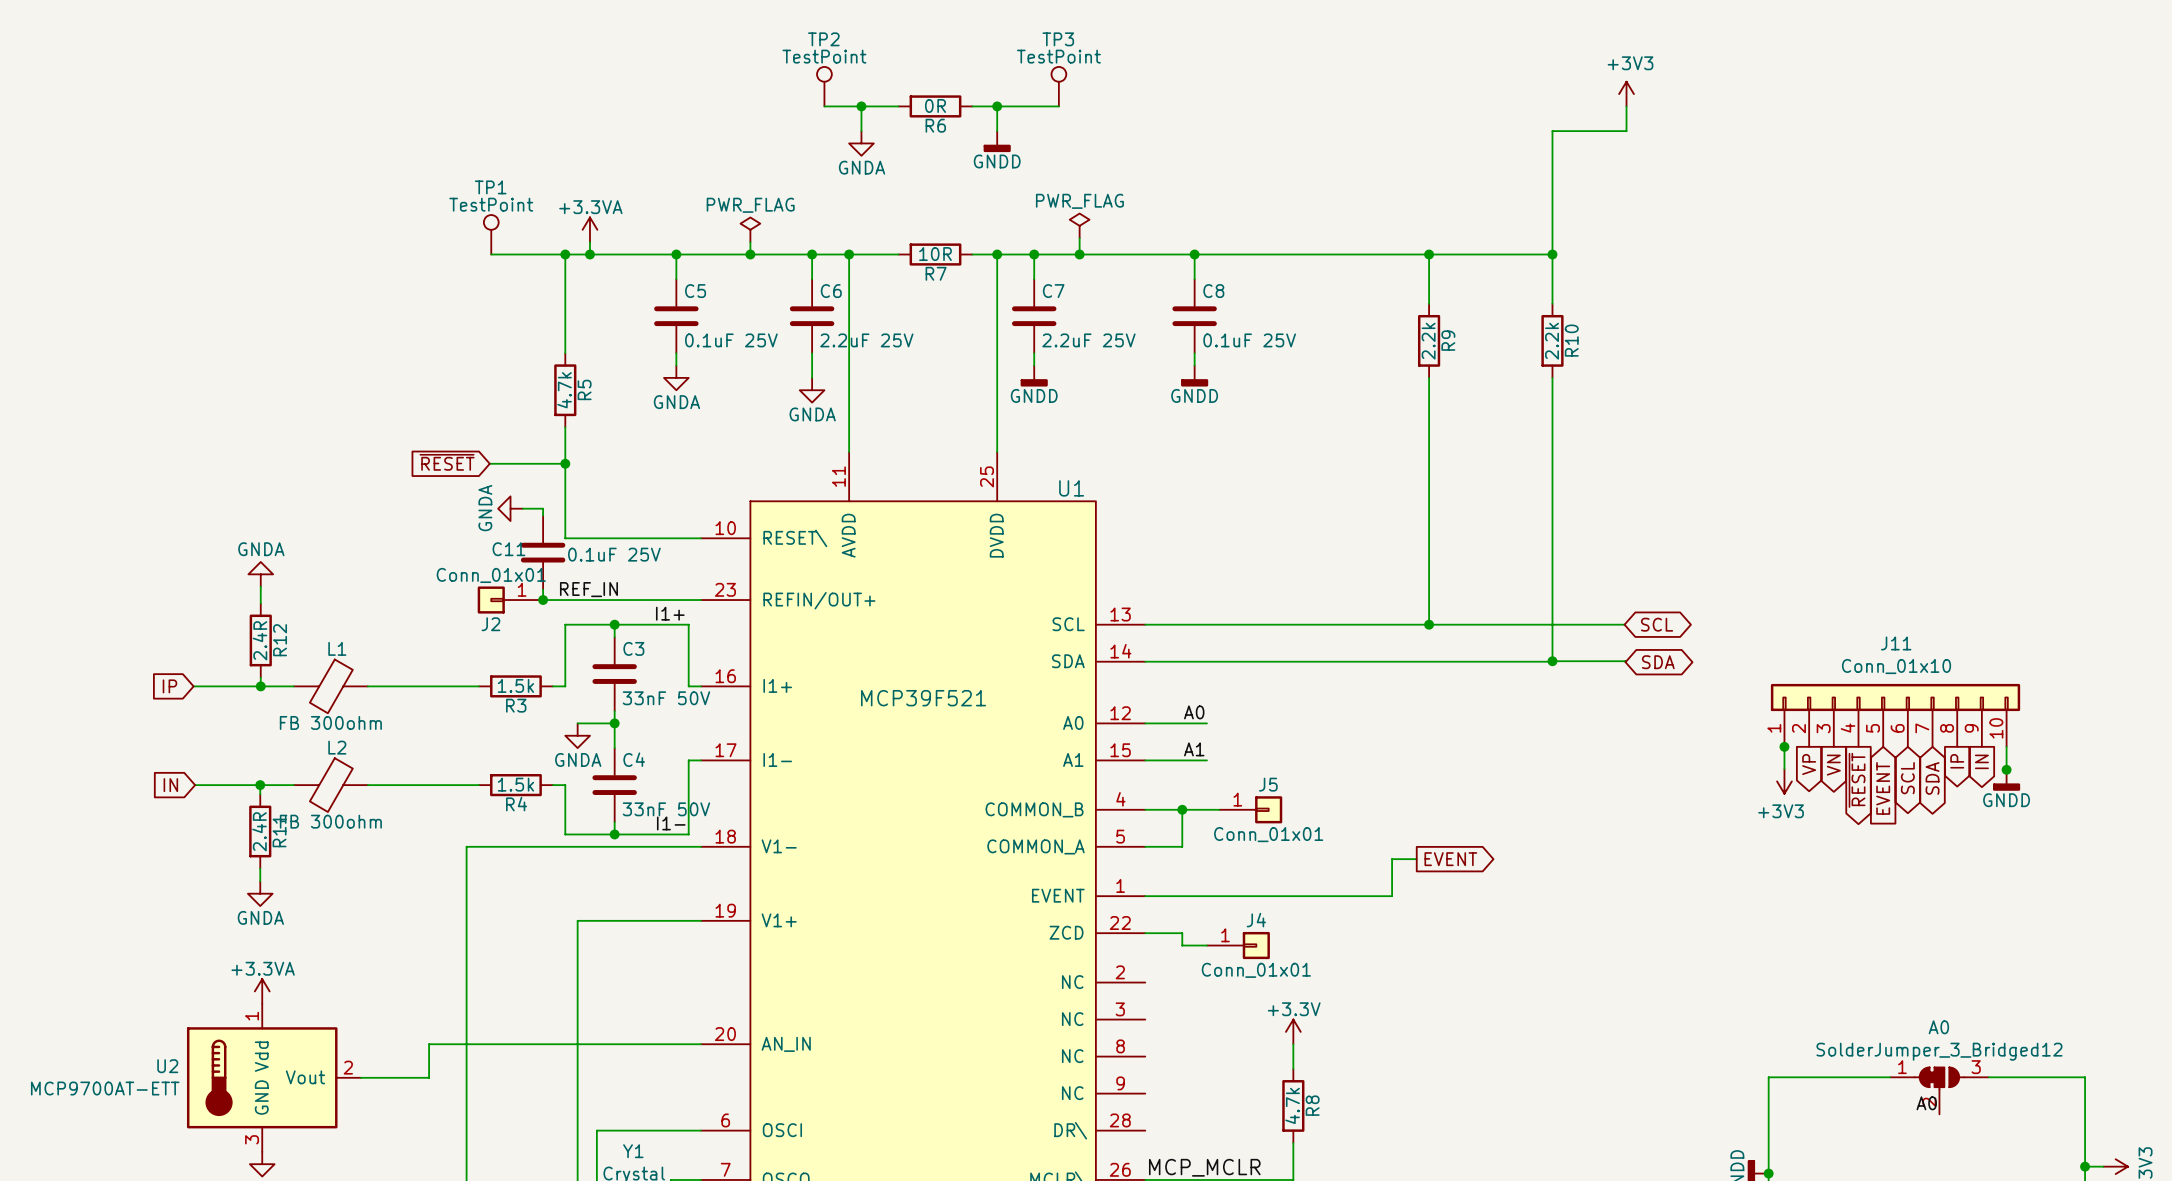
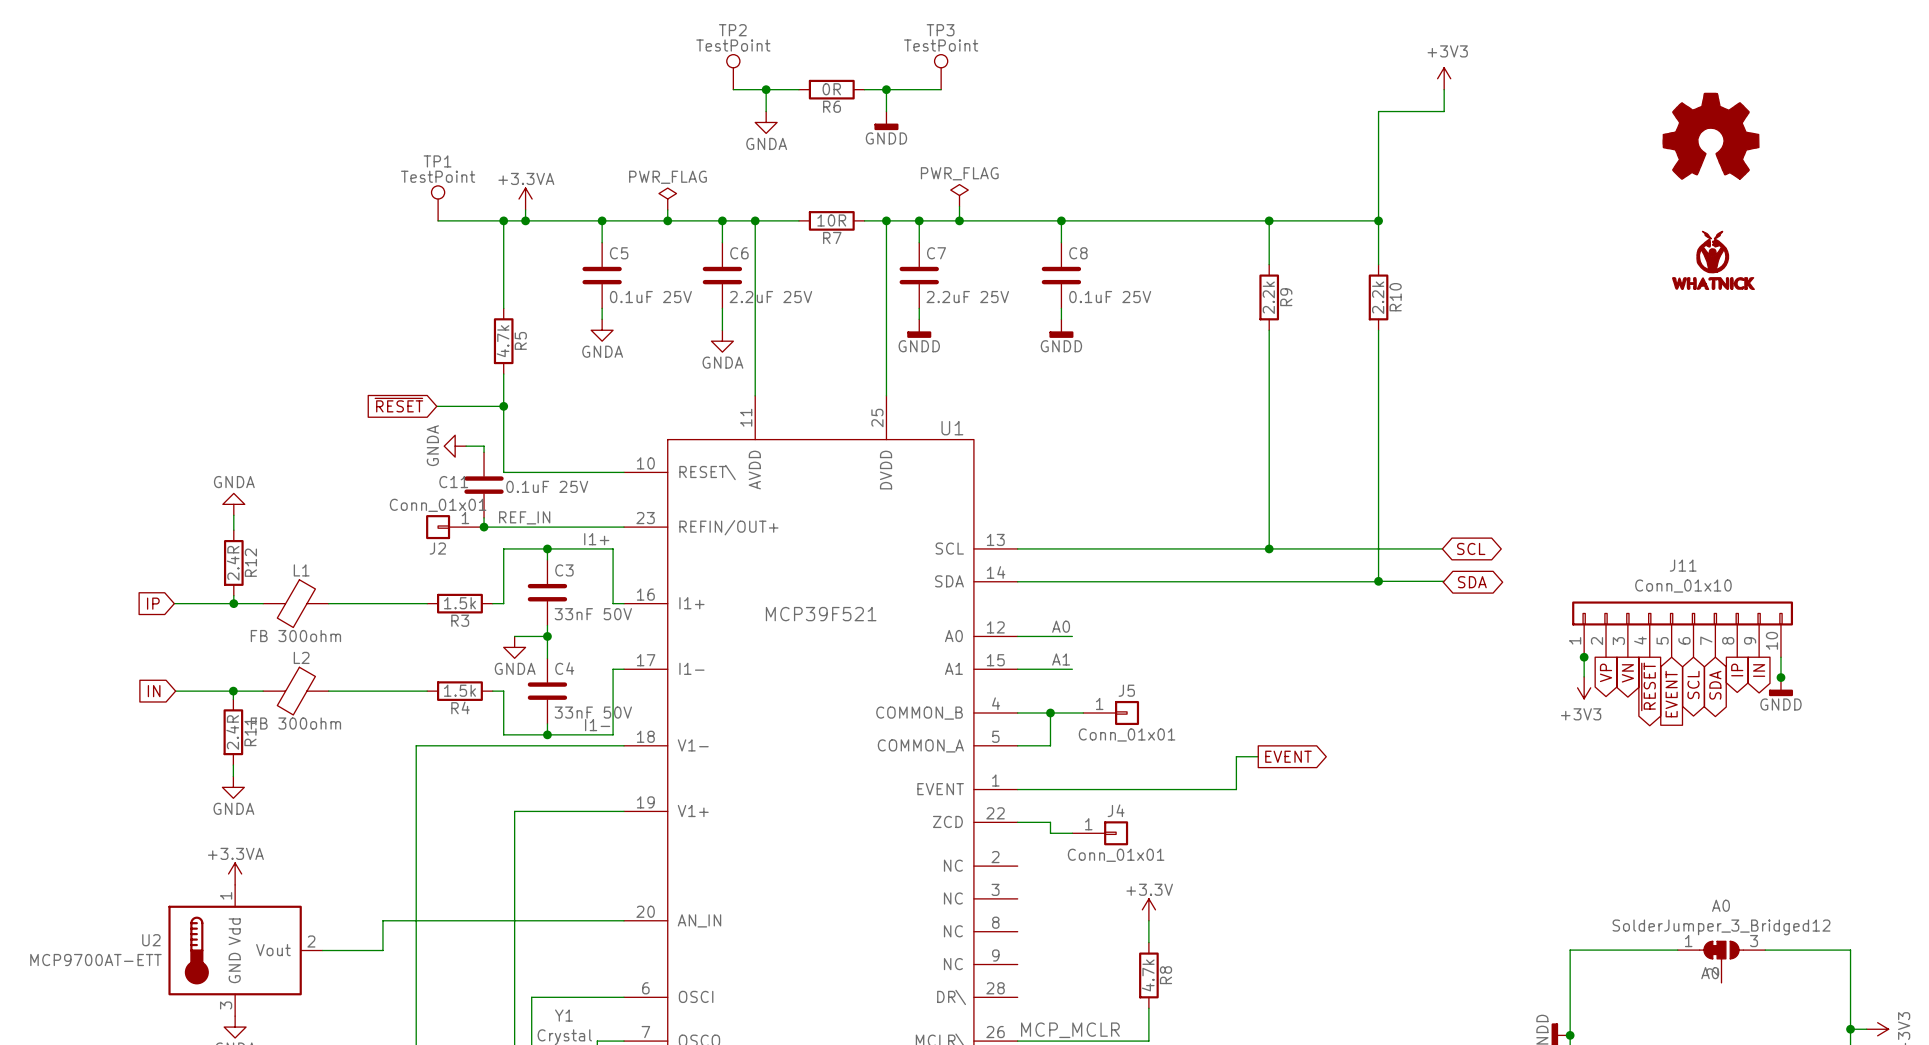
part: none -> (1711, 136)
part: none -> (1713, 260)

